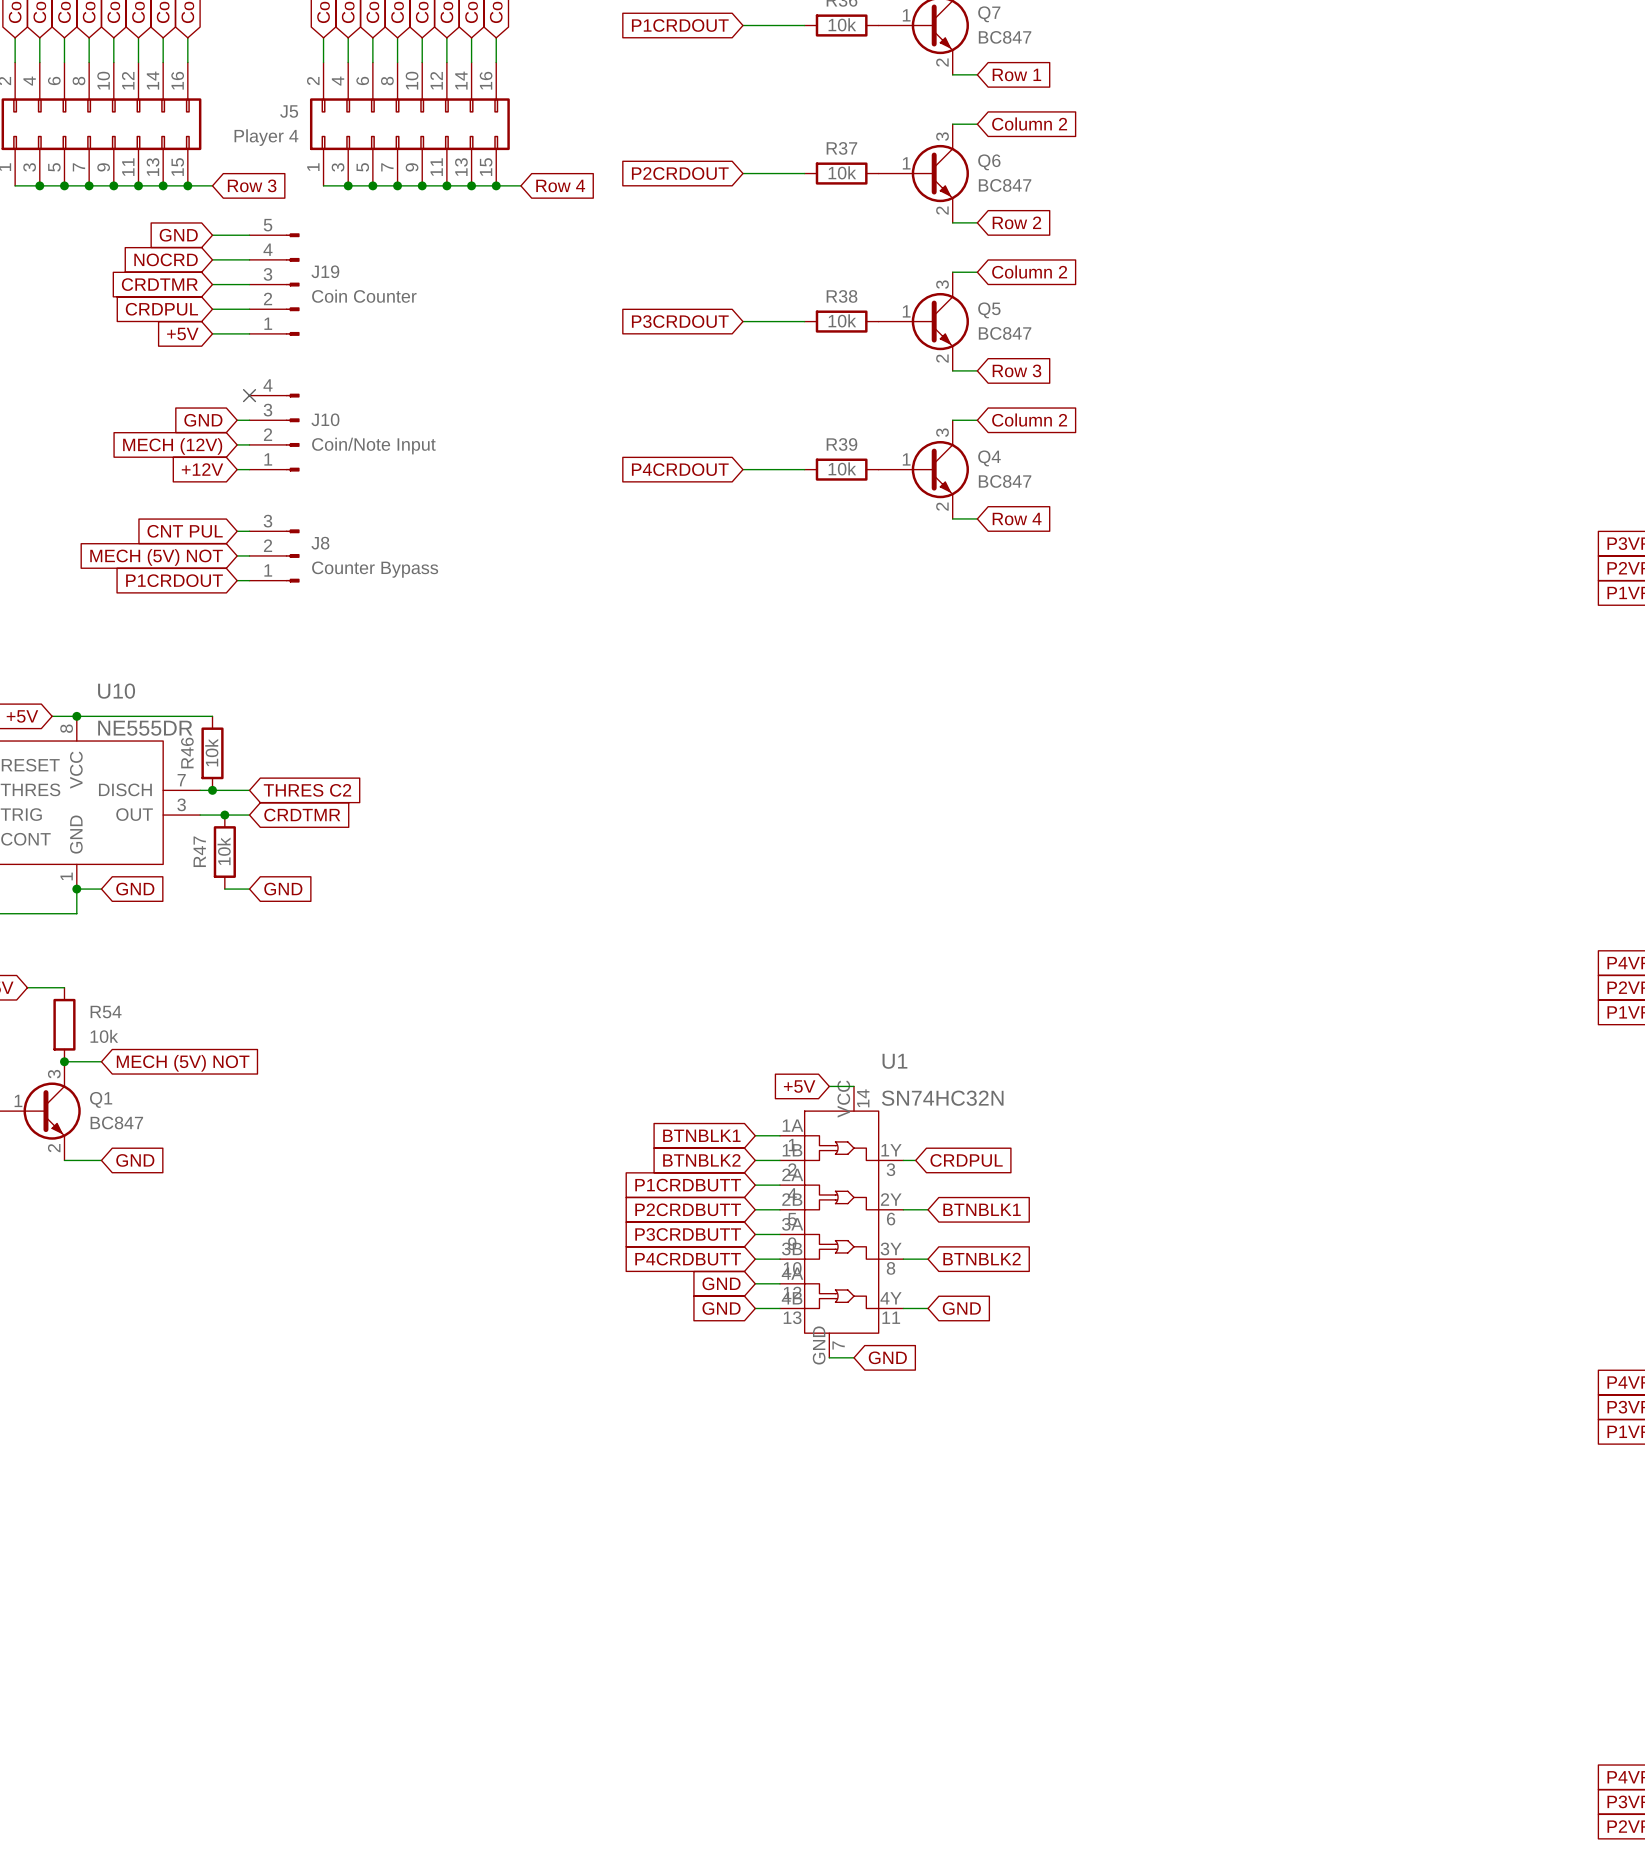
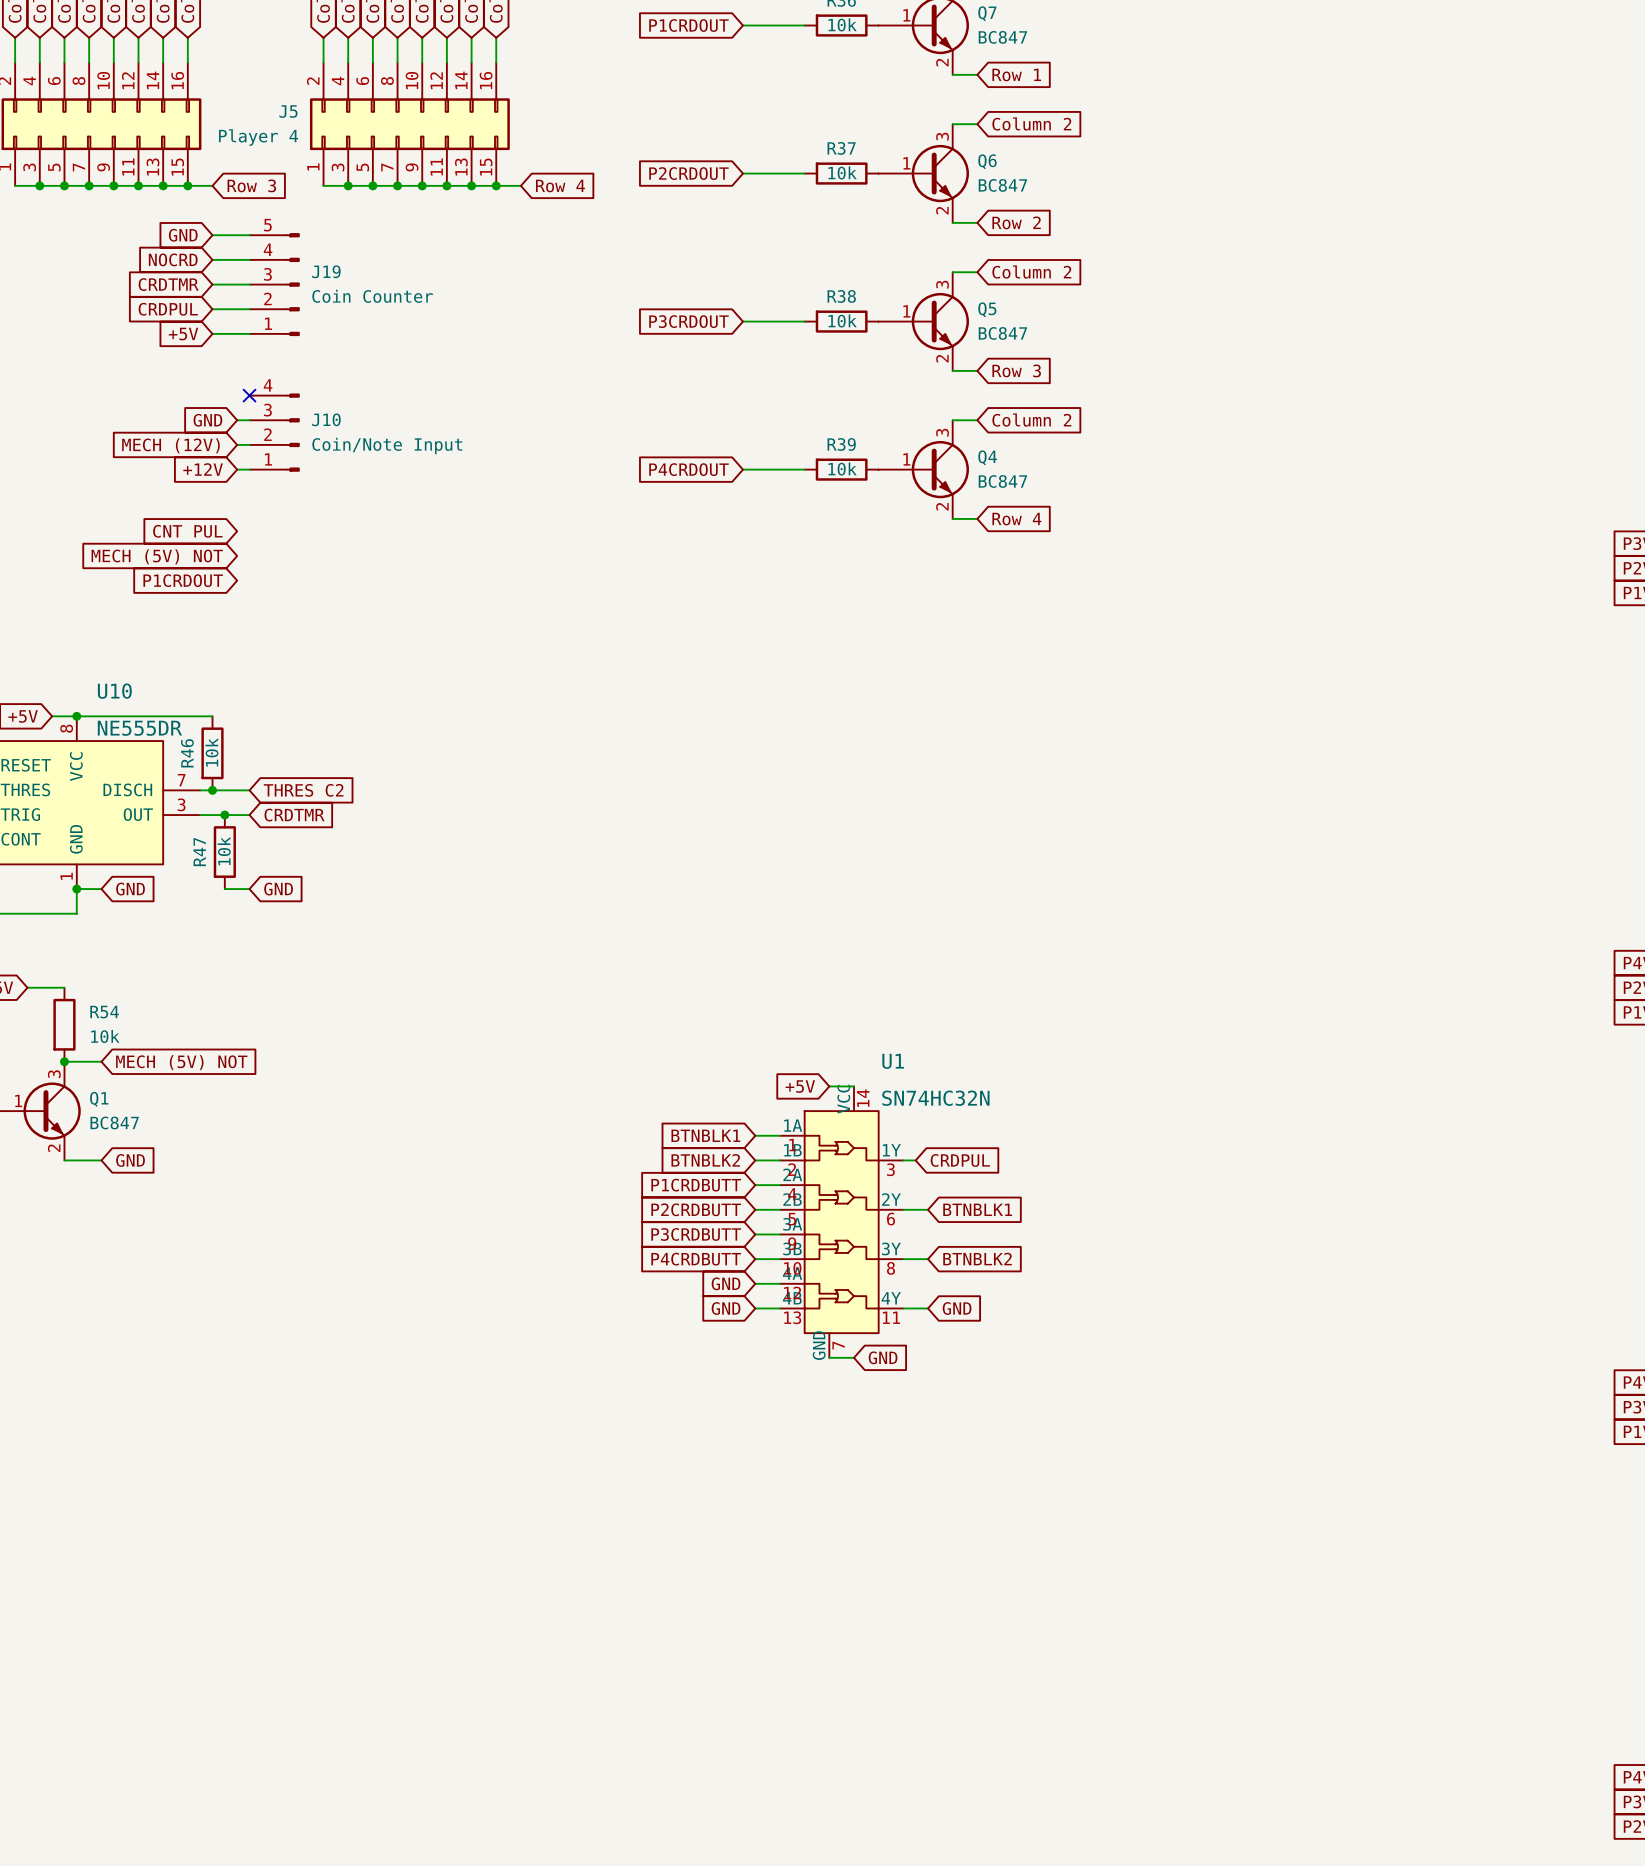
wire: (237, 531) (249, 531) -> none
wire: (237, 555) (249, 555) -> none
J8: Counter Bypass (274, 555) -> none
wire: (237, 580) (249, 580) -> none

